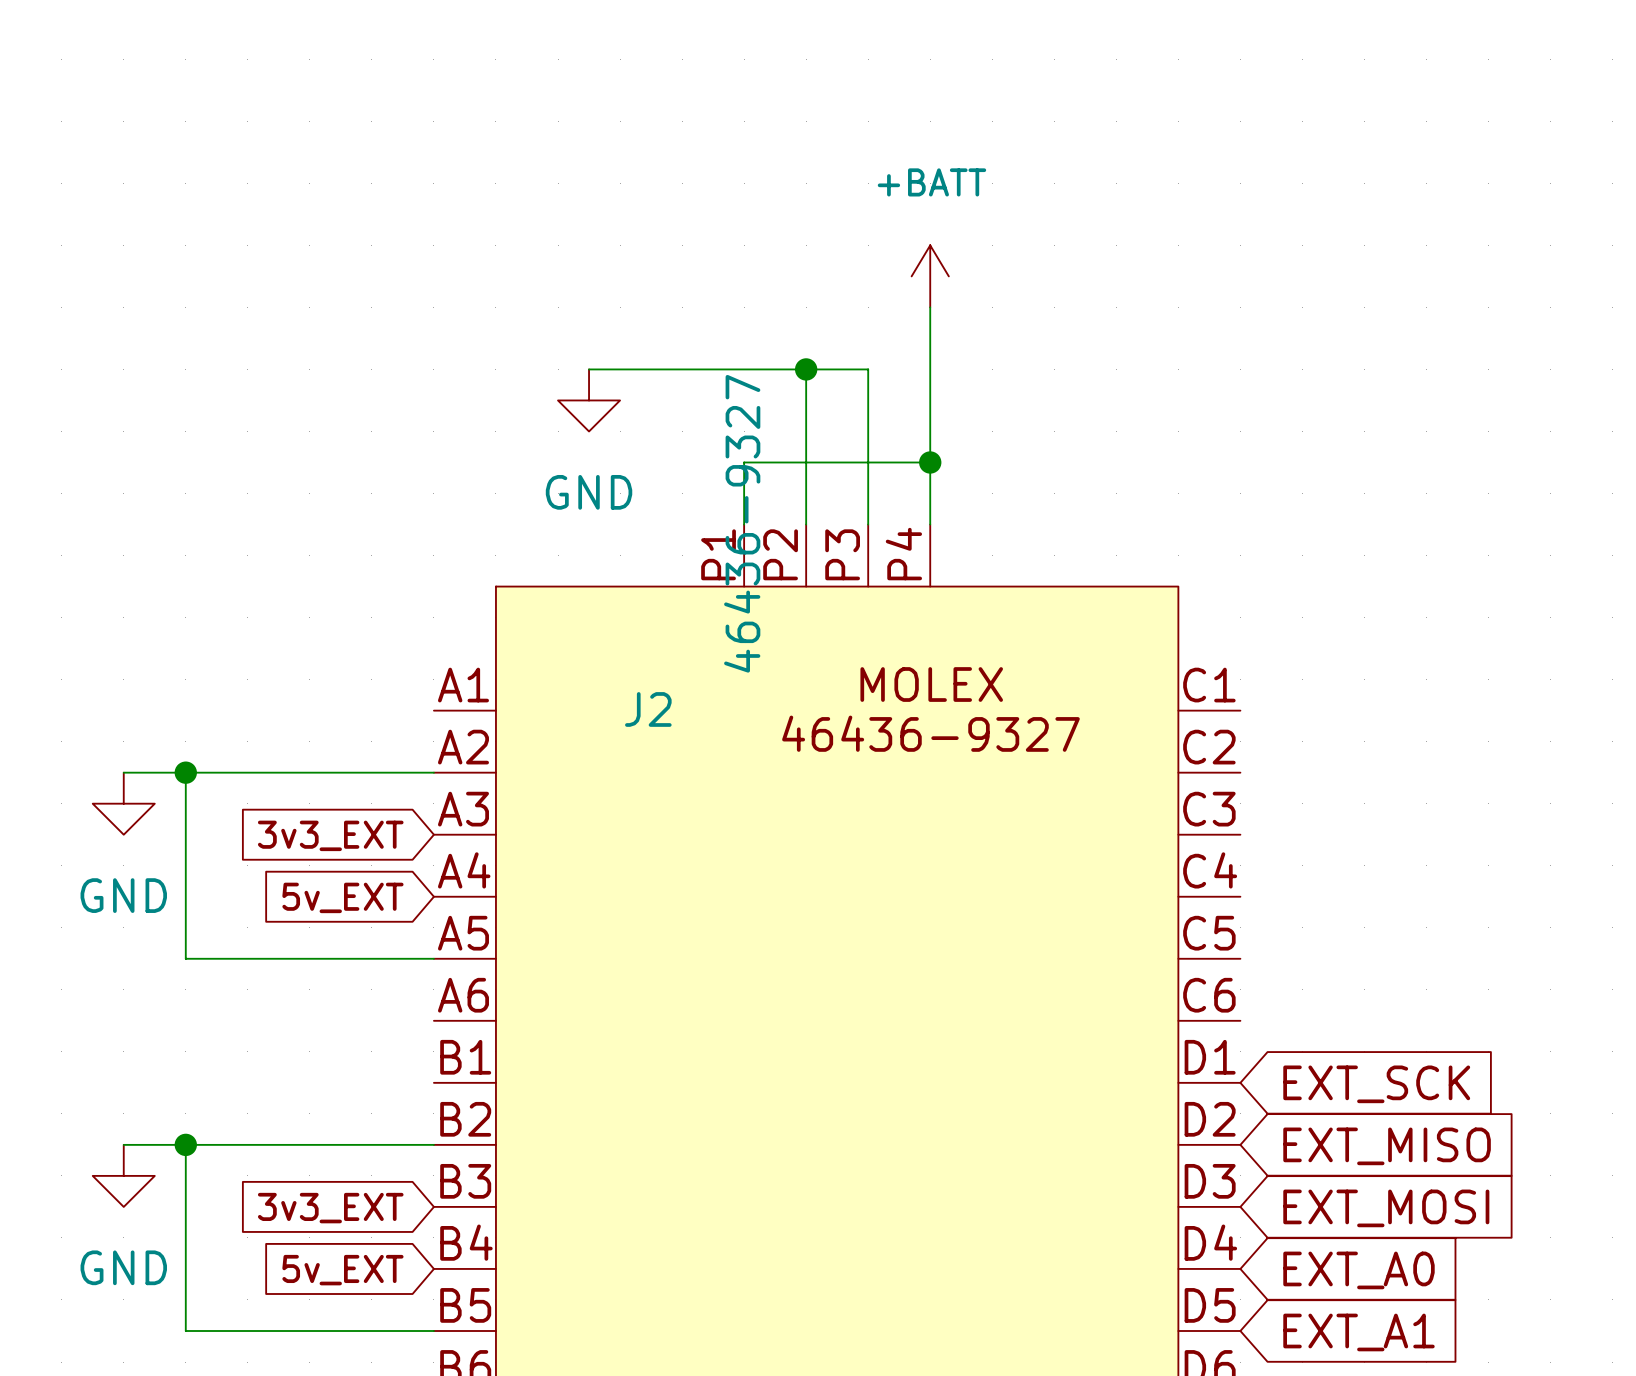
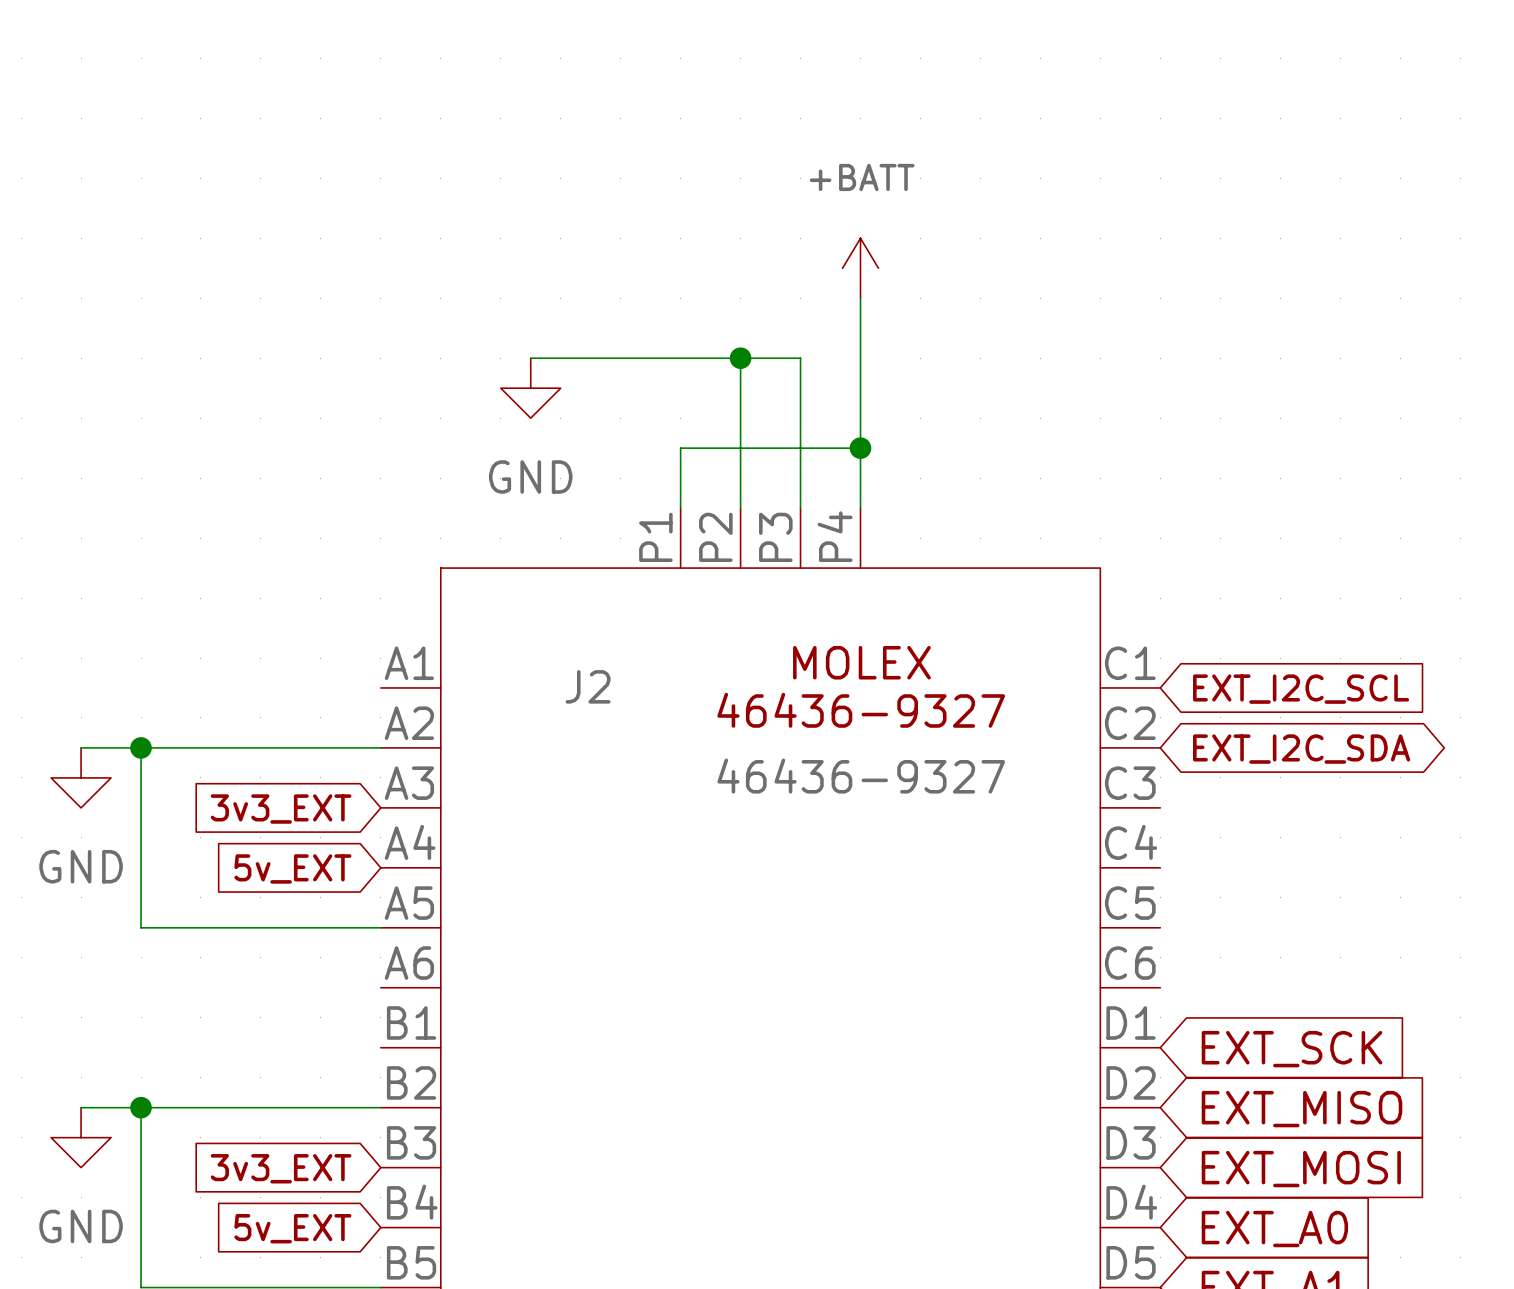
J2 value rotation: 0° (742, 523) -> 90° clockwise (861, 776)
J2 value position: 46436-9327 (742, 523) -> 46436-9327 (861, 776)
global label: none -> EXT_I2C_SCL (1301, 689)
global label: none -> EXT_I2C_SDA (1301, 749)

